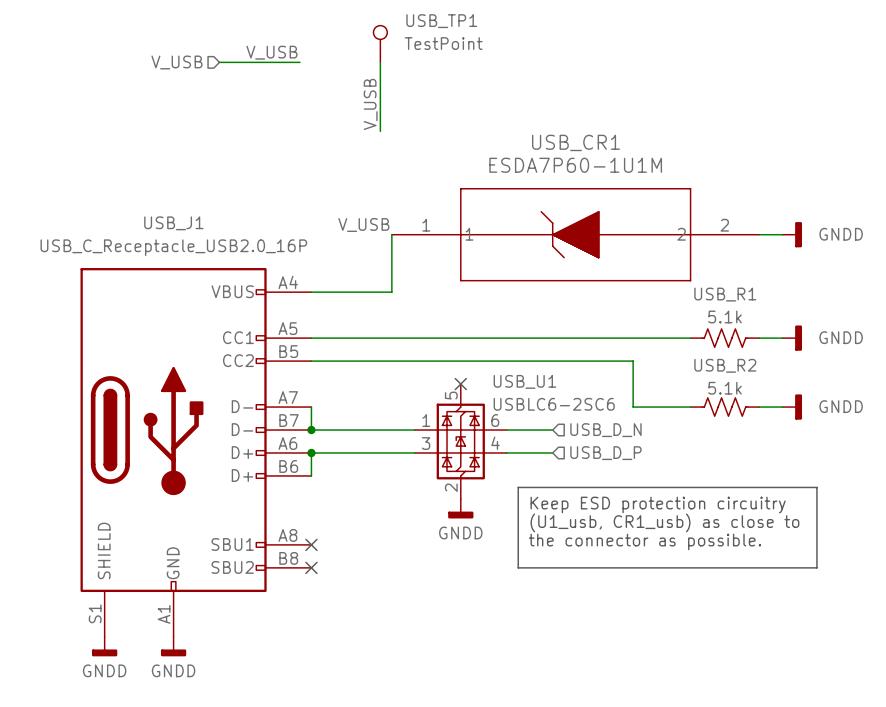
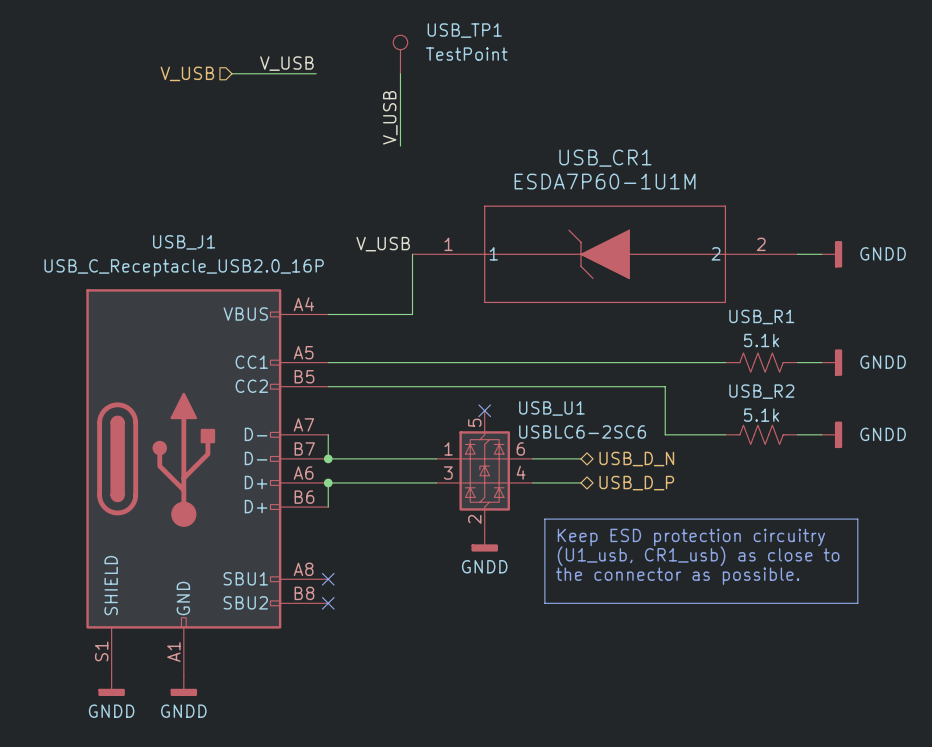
hierarchical label shape: input (605, 430) -> bidirectional (636, 459)
hierarchical label shape: input (605, 453) -> bidirectional (636, 483)

